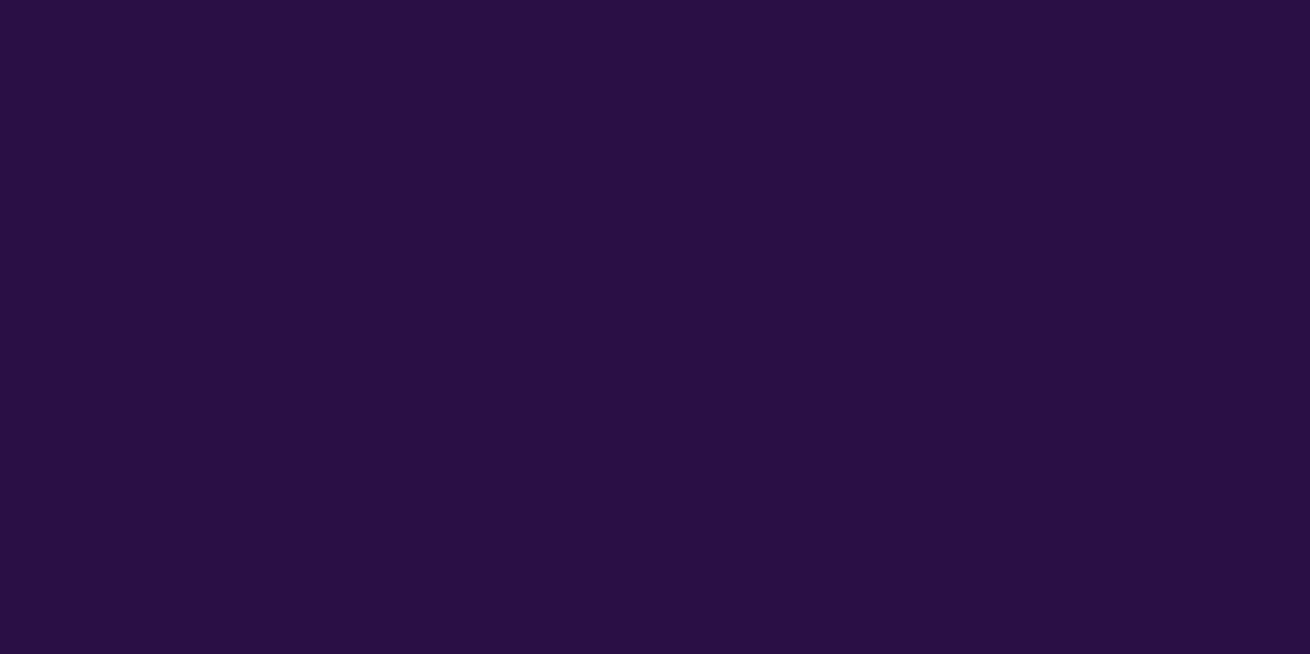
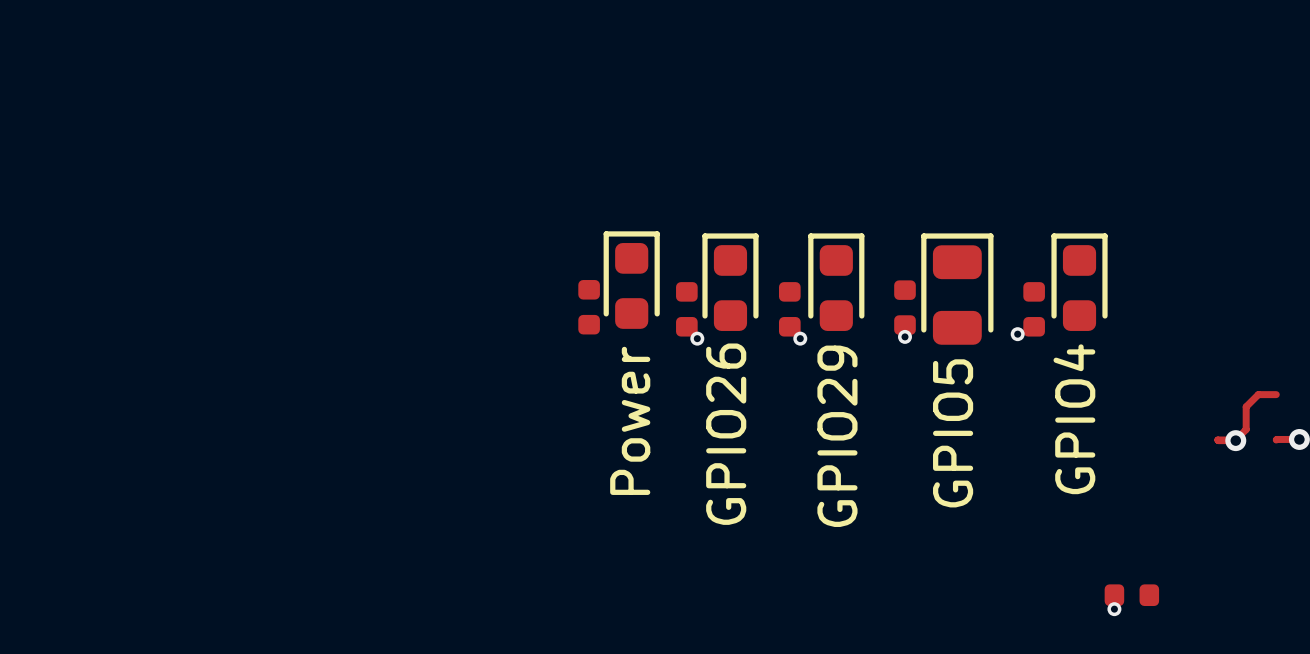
part: none -> (631, 280)
part: none -> (730, 282)
part: none -> (836, 282)
part: none -> (1079, 282)
part: none -> (957, 289)
part: none -> (589, 307)
part: none -> (904, 307)
part: none -> (686, 309)
part: none -> (789, 309)
part: none -> (1034, 309)
via: none -> (1017, 334)
via: none -> (904, 336)
via: none -> (697, 338)
via: none -> (800, 338)
track: none -> (1276, 394) (1258, 394) (1246, 406) (1246, 429) (1235, 439) (1217, 439) (1235, 440)
text: none -> GPIO4 (1074, 419)
text: none -> Power (630, 420)
track: none -> (1299, 439) (1276, 439)
via: none -> (1299, 439)
via: none -> (1235, 440)
text: none -> GPIO5 (953, 433)
text: none -> GPIO26 (726, 434)
text: none -> GPIO29 (837, 436)
part: none -> (1131, 595)
via: none -> (1114, 609)

